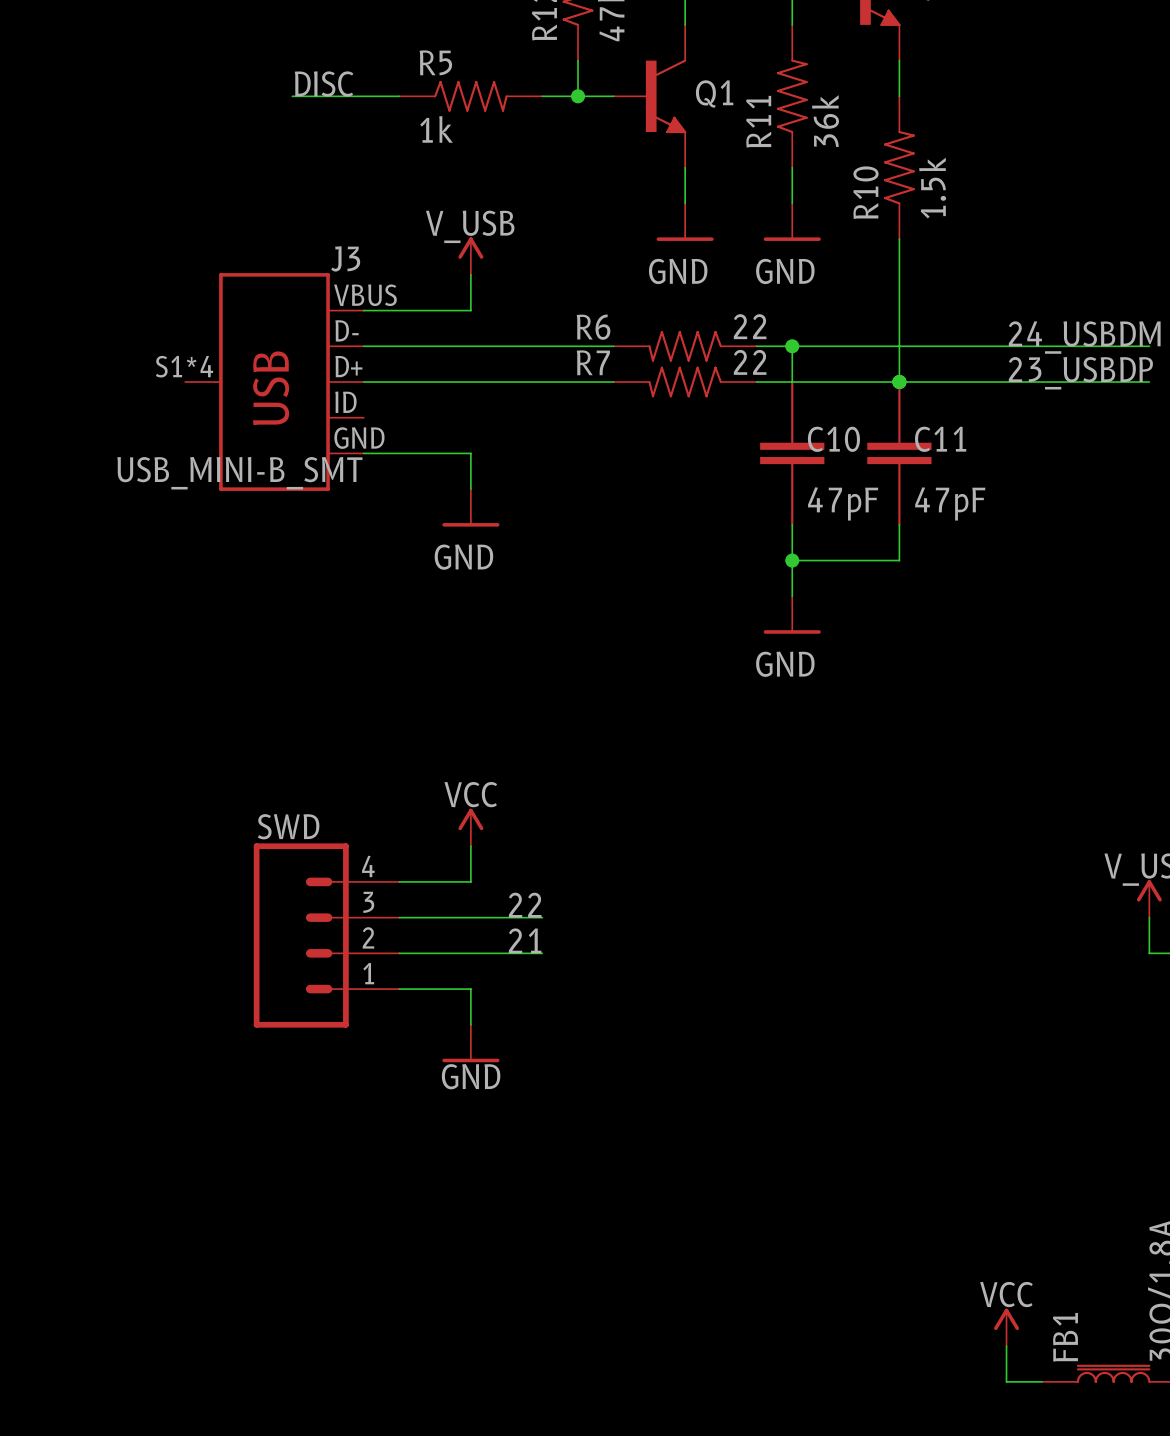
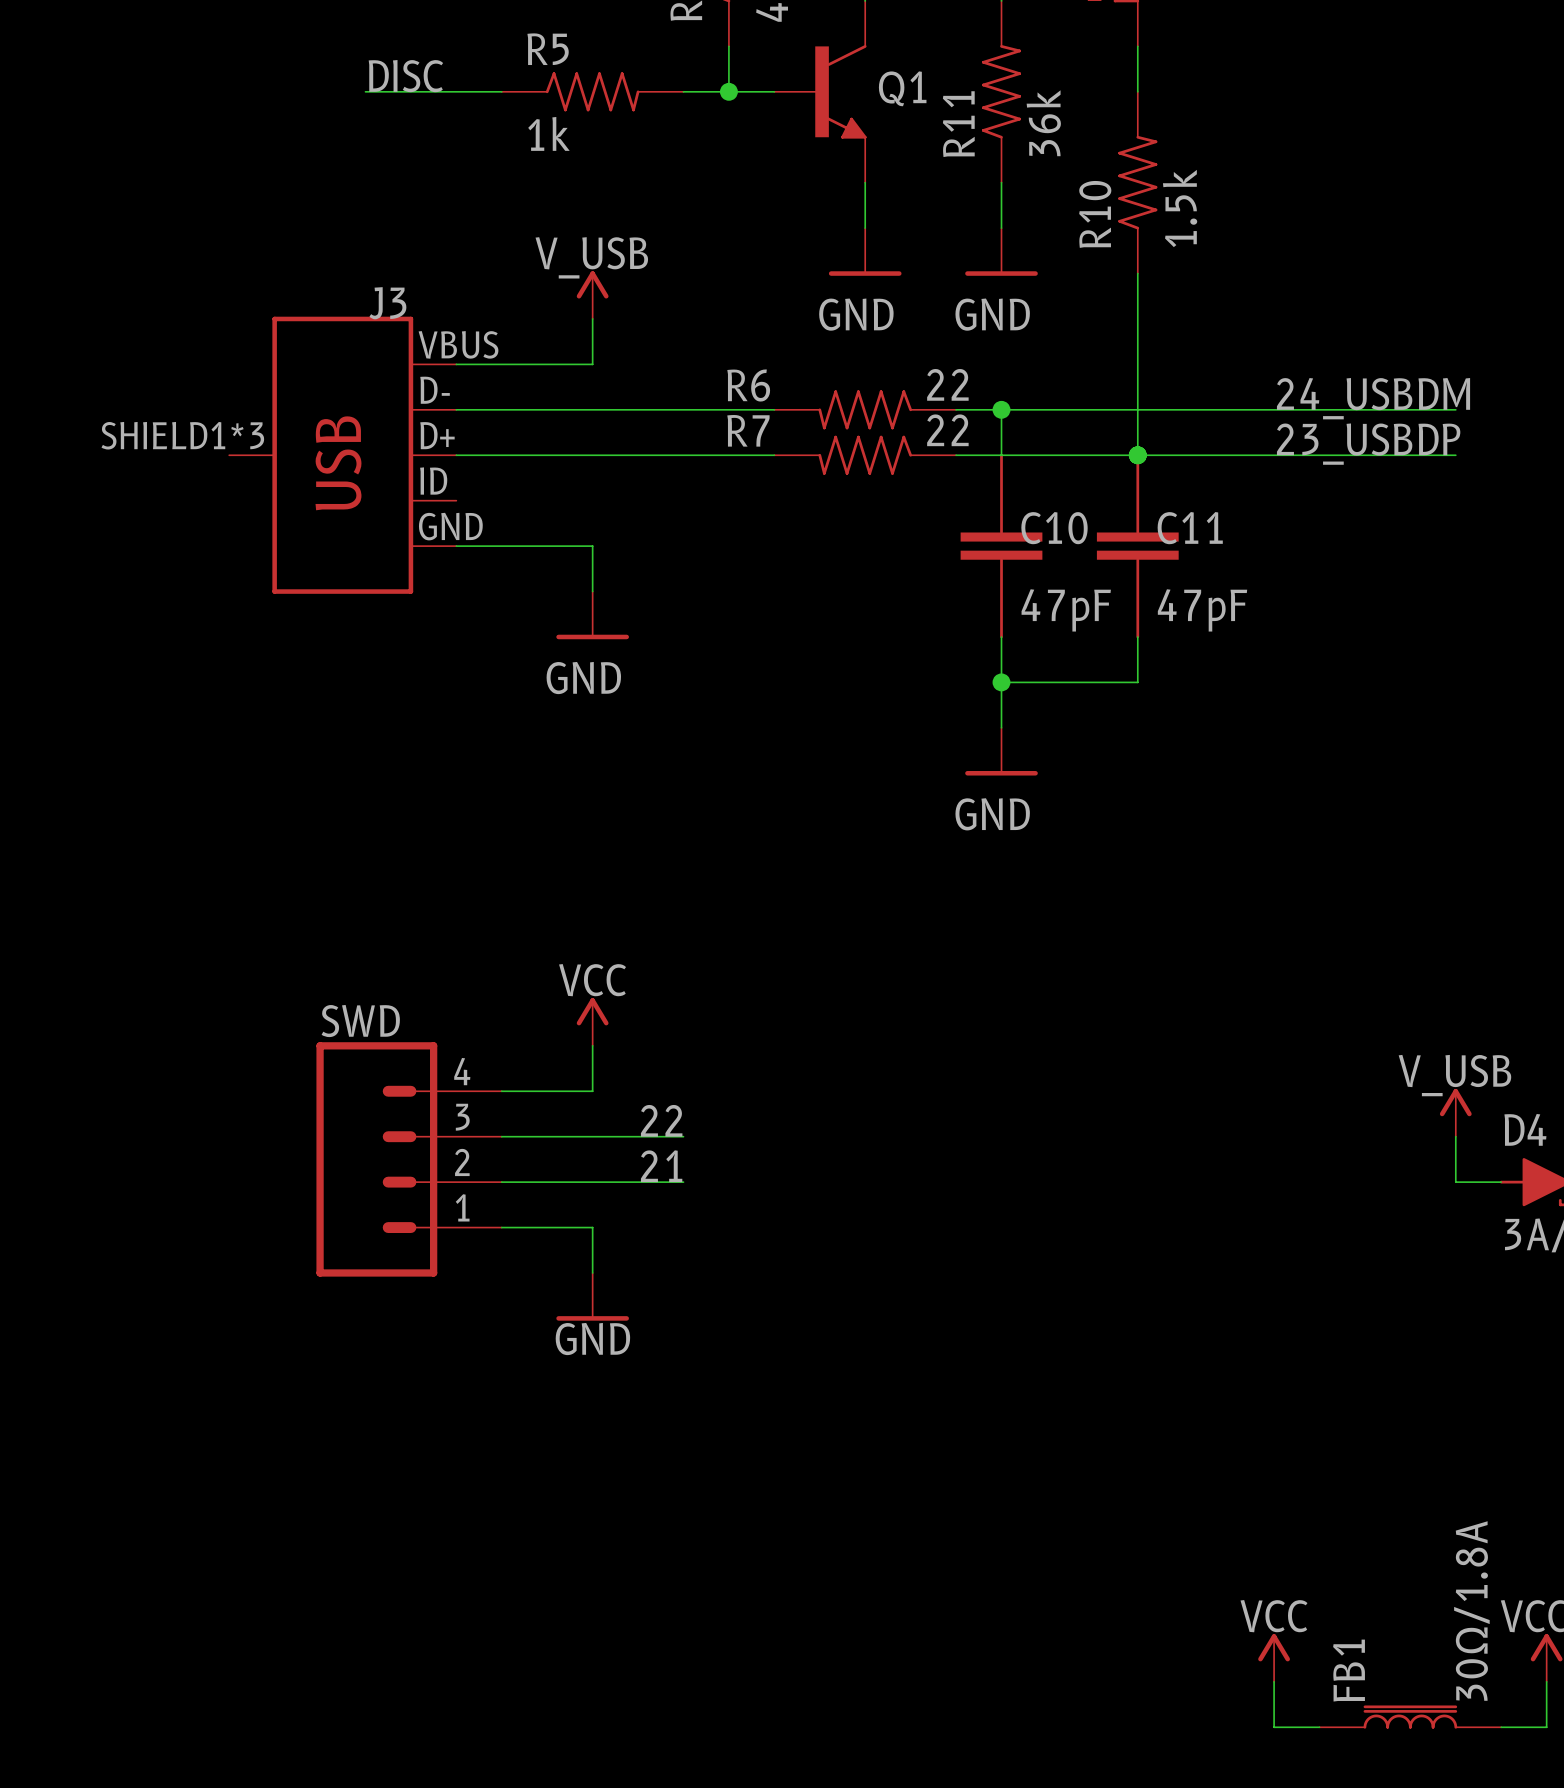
J3 name position: J3 (345, 258) -> J3 (387, 303)
J3 pin number: S1*4 (184, 366) -> SHIELD1*3 (182, 435)
J3 value: USB_MINI-B_SMT (239, 473) -> none

